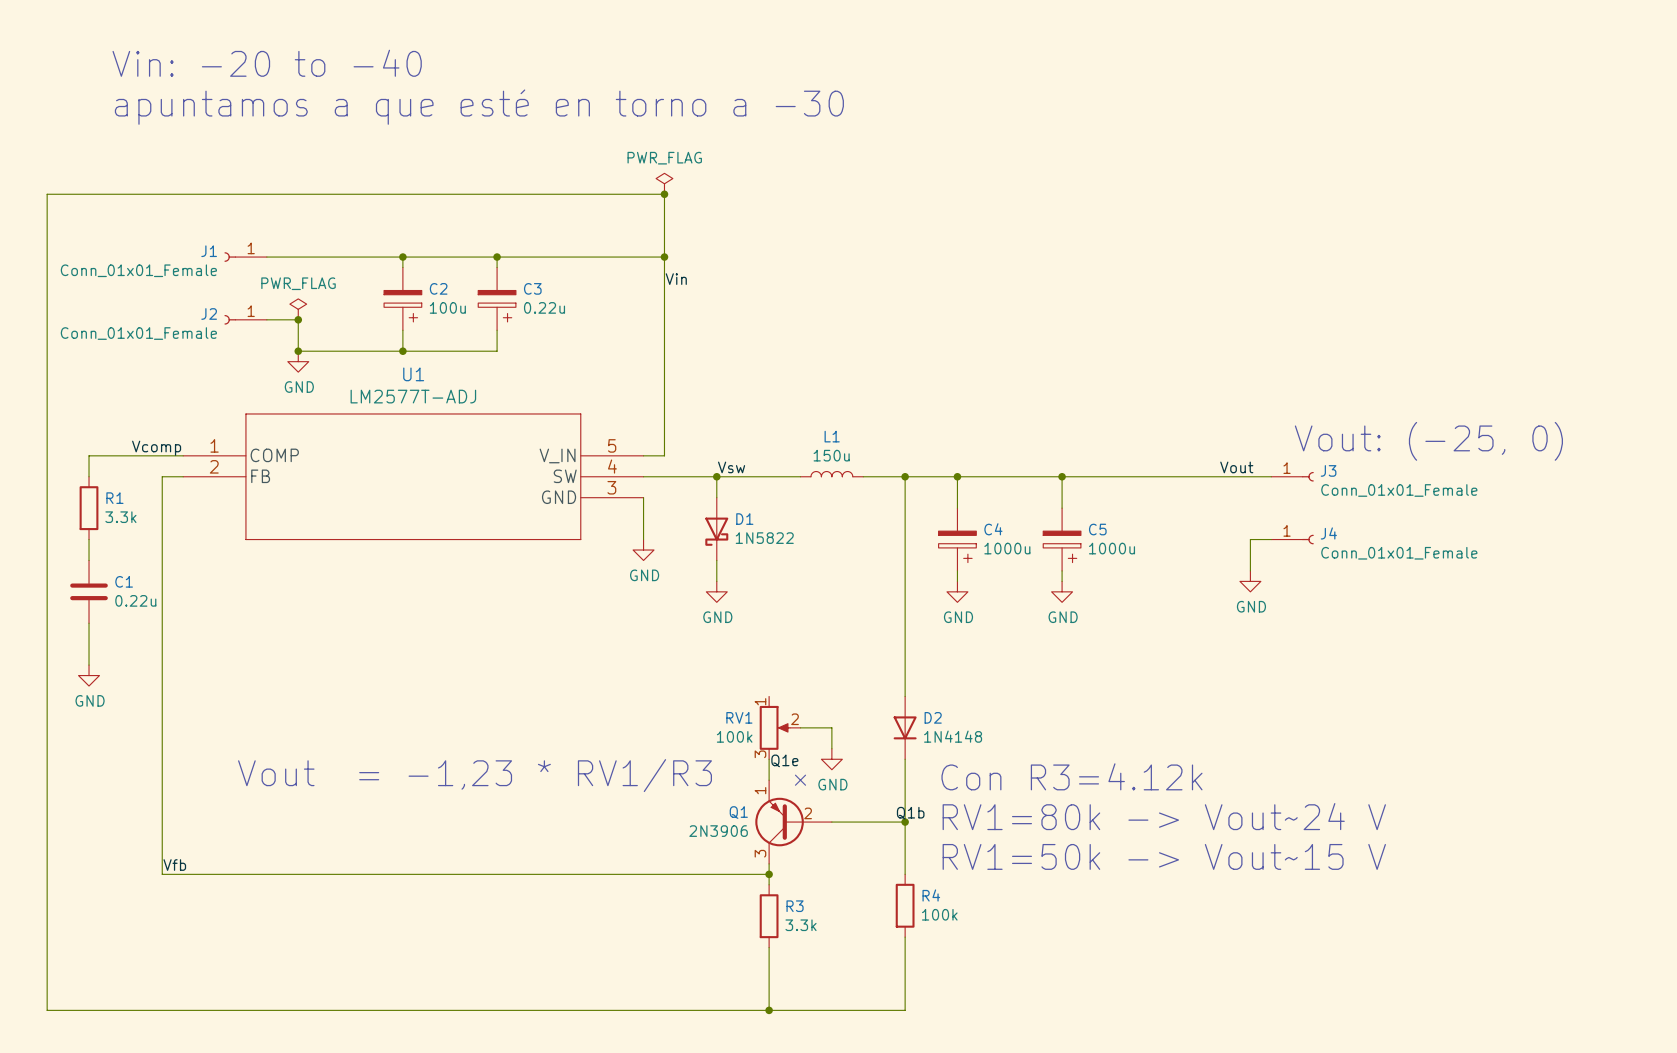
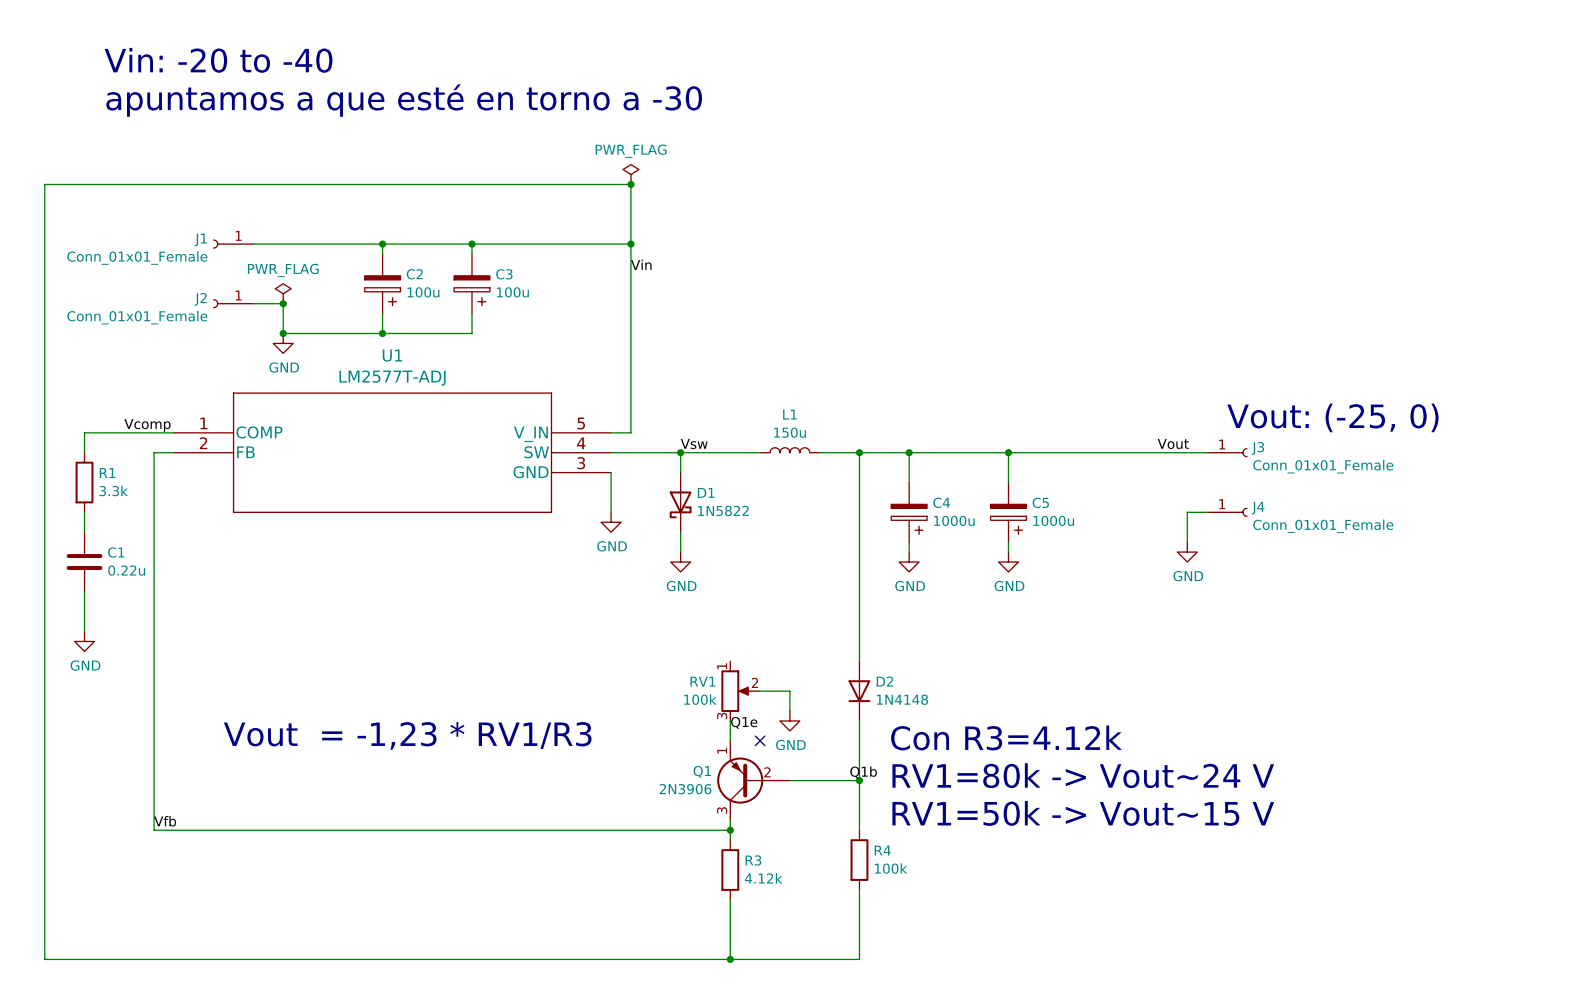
C3 value: 0.22u (544, 307) -> 100u (512, 292)
R3 value: 3.3k (801, 925) -> 4.12k (763, 878)

